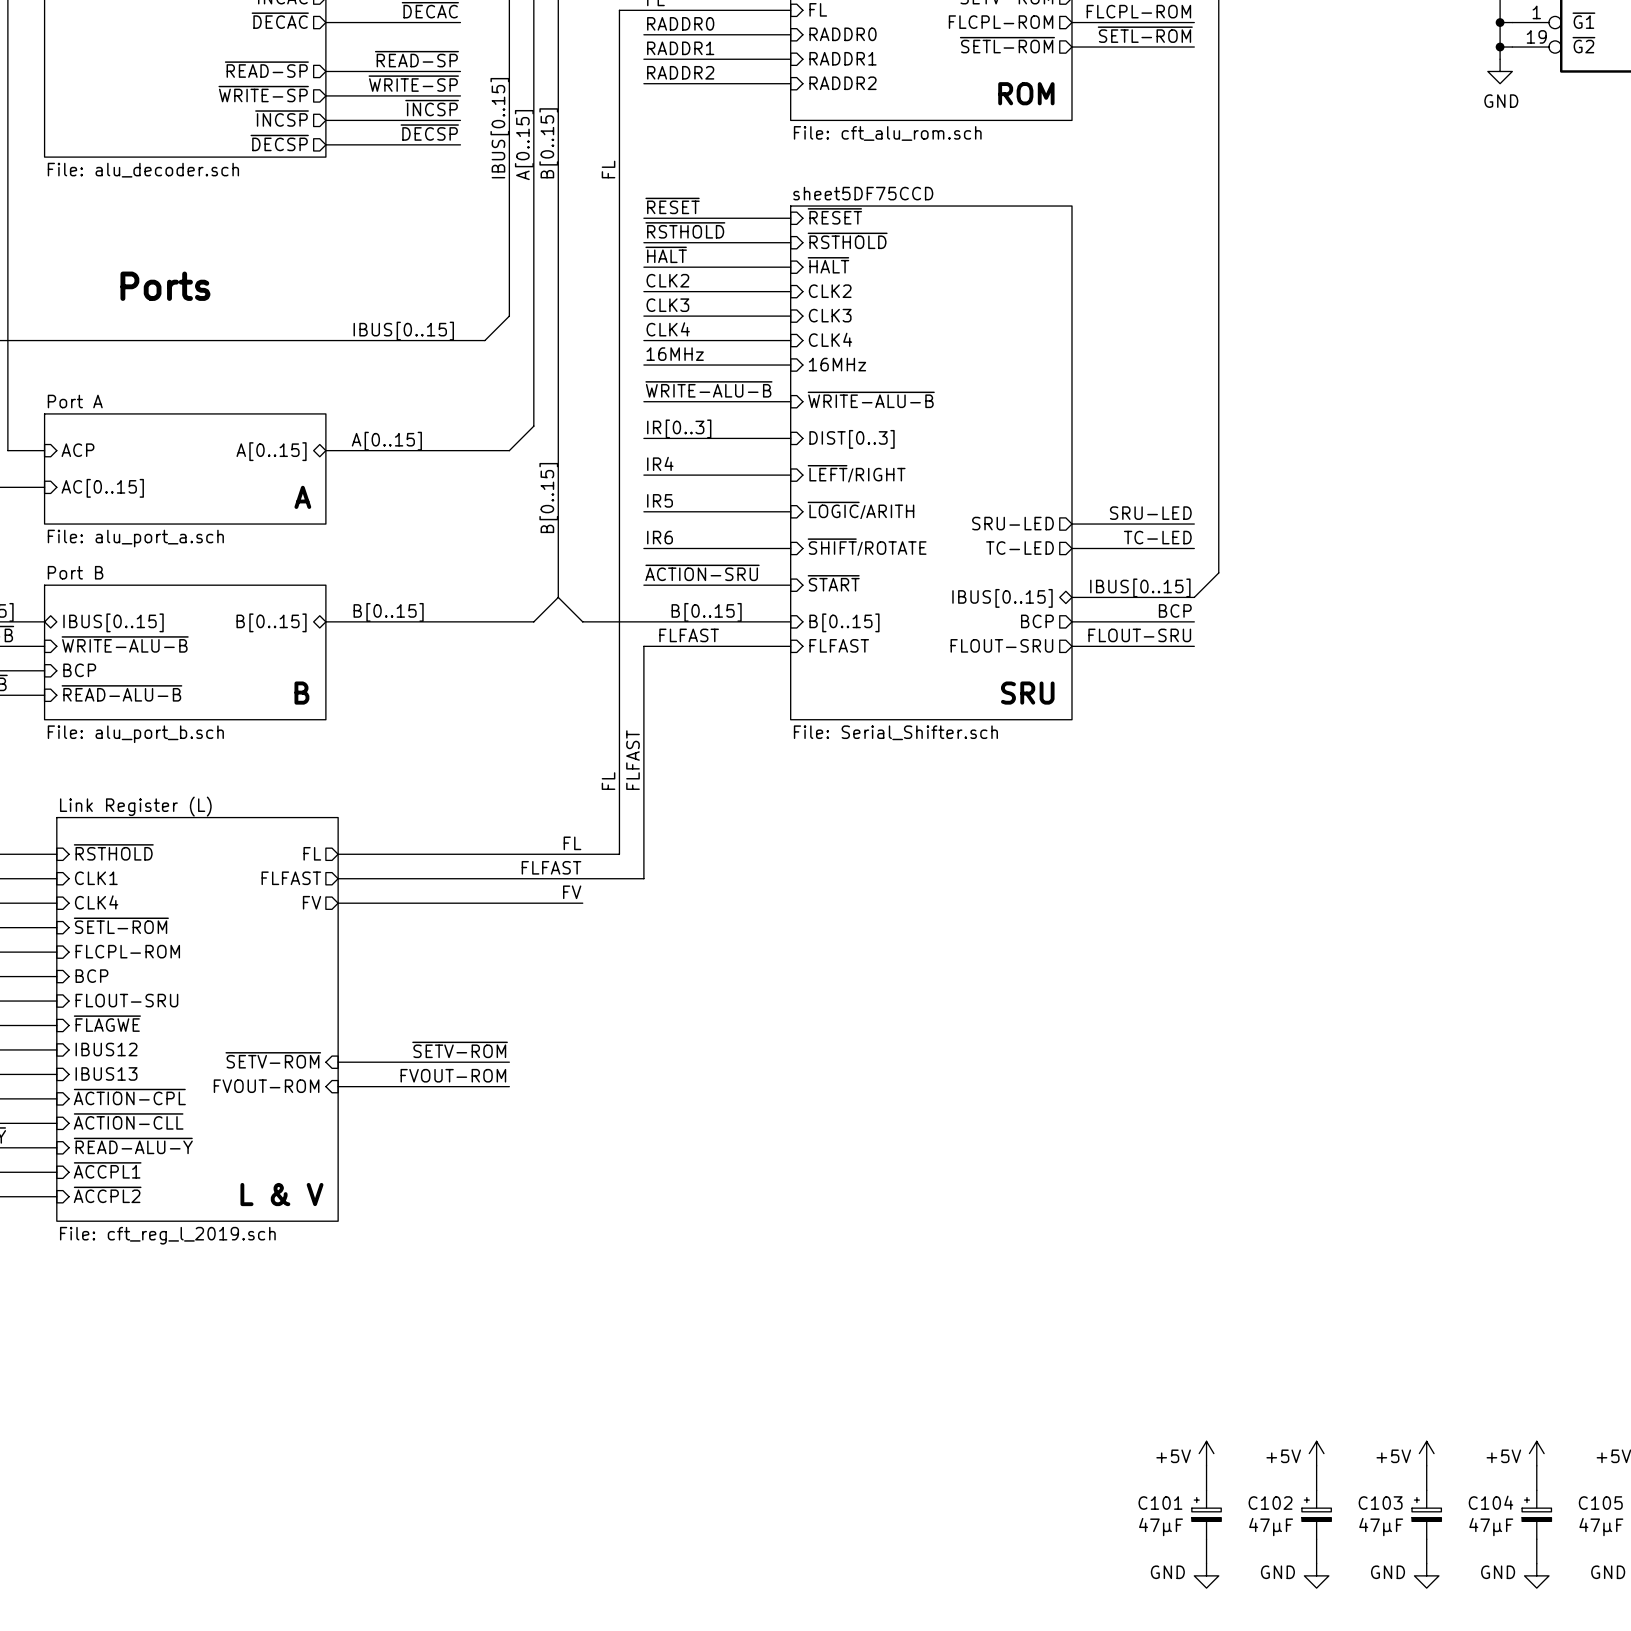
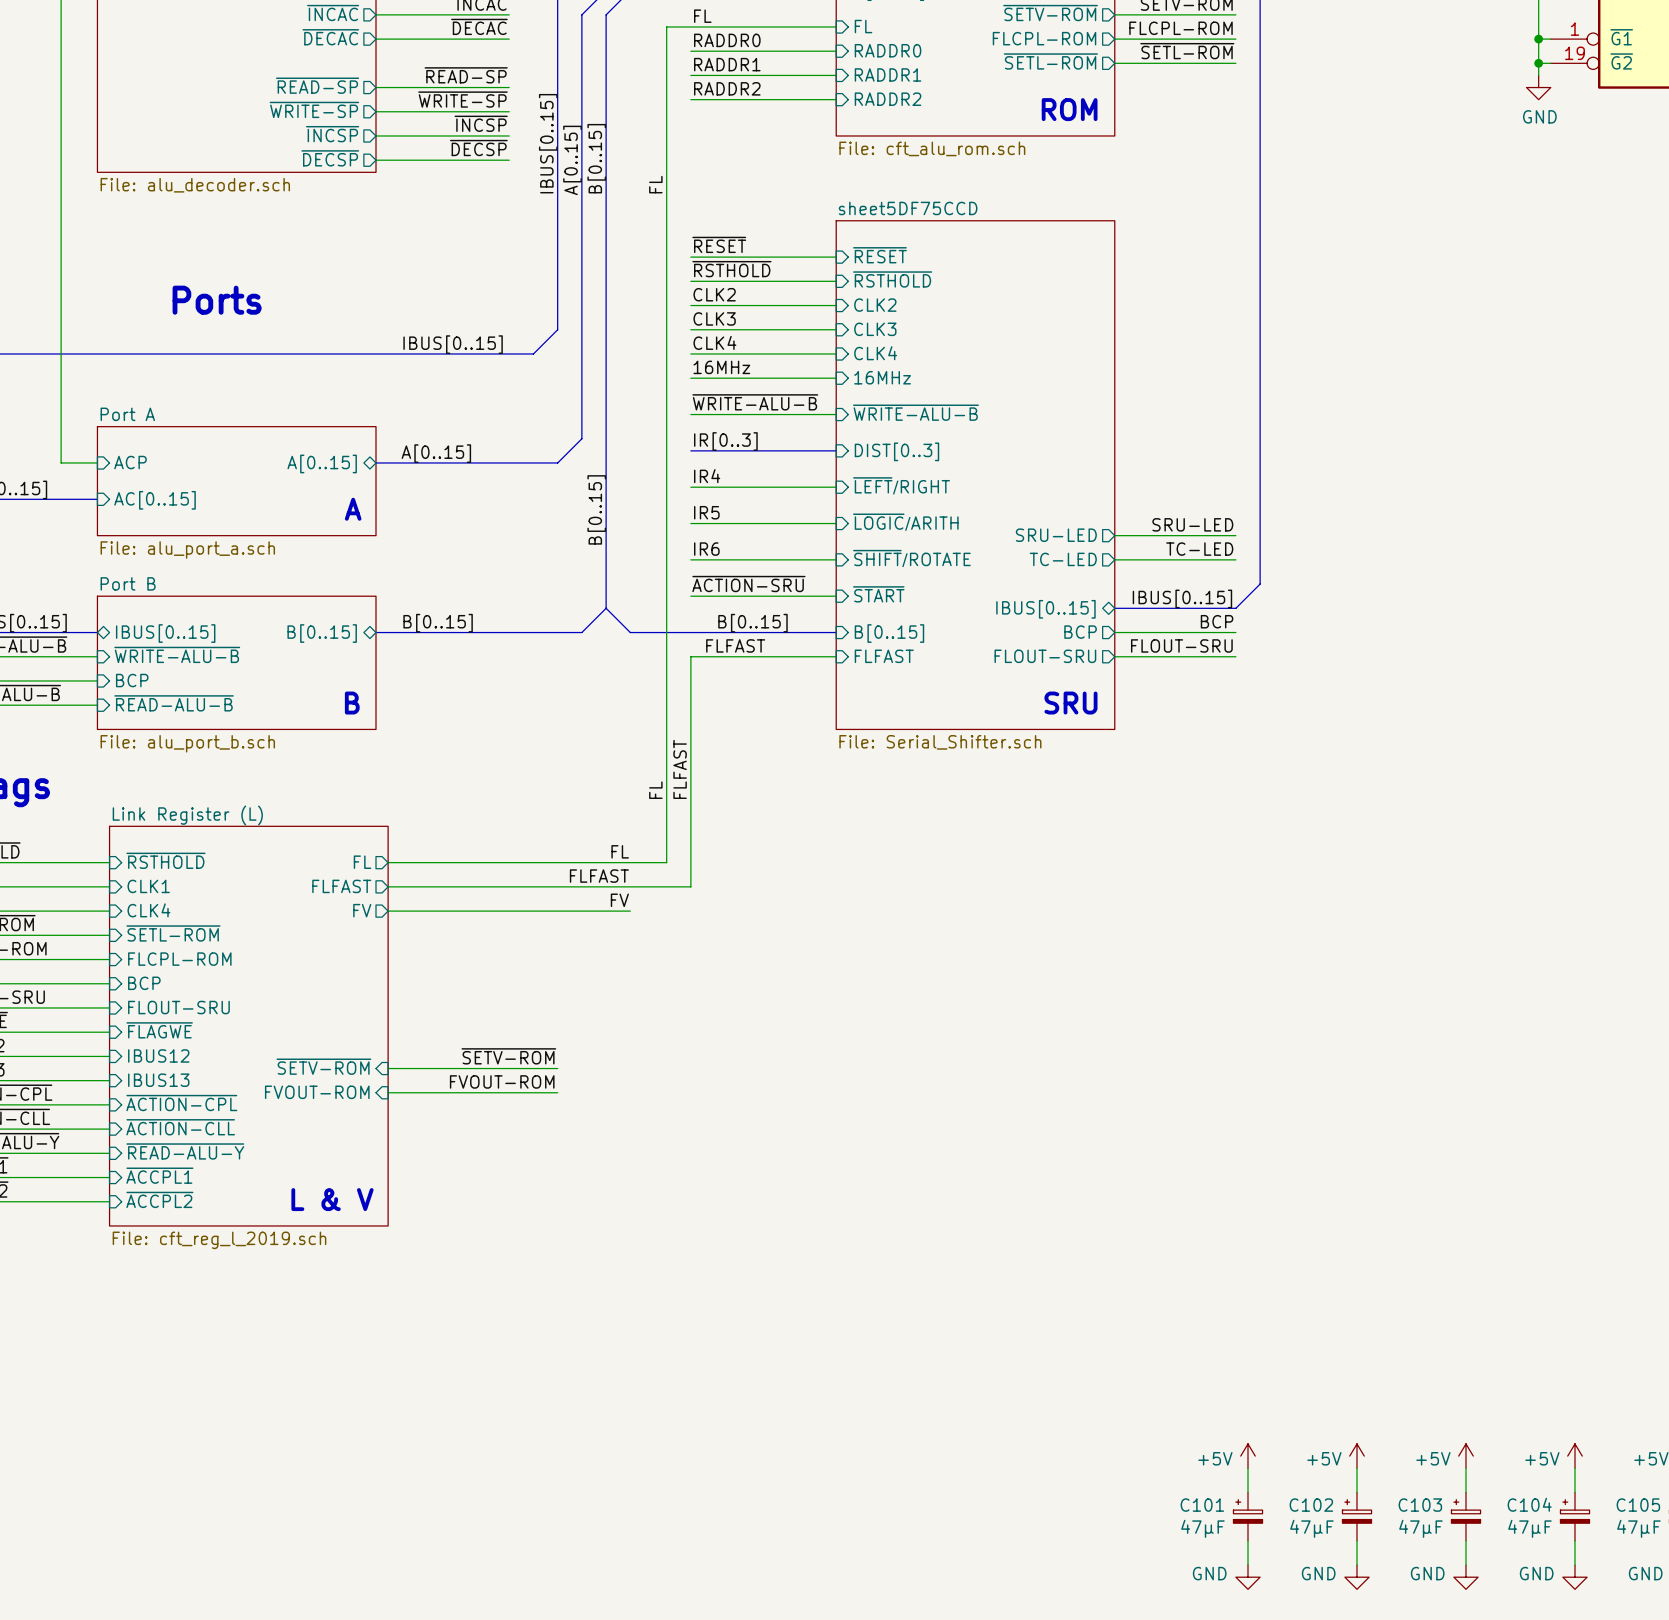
label: ~{RESET} (672, 205) -> none
sheet pin: ~{RESET} (834, 216) -> none
wire: (643, 218) (790, 218) -> none
label: ~{RSTHOLD} (685, 230) -> ~{RESET} (719, 244)
sheet pin: ~{RSTHOLD} (847, 240) -> ~{RESET} (879, 255)
label: ~{HALT} (666, 254) -> ~{RSTHOLD} (731, 269)
sheet pin: ~{HALT} (828, 265) -> ~{RSTHOLD} (892, 279)

